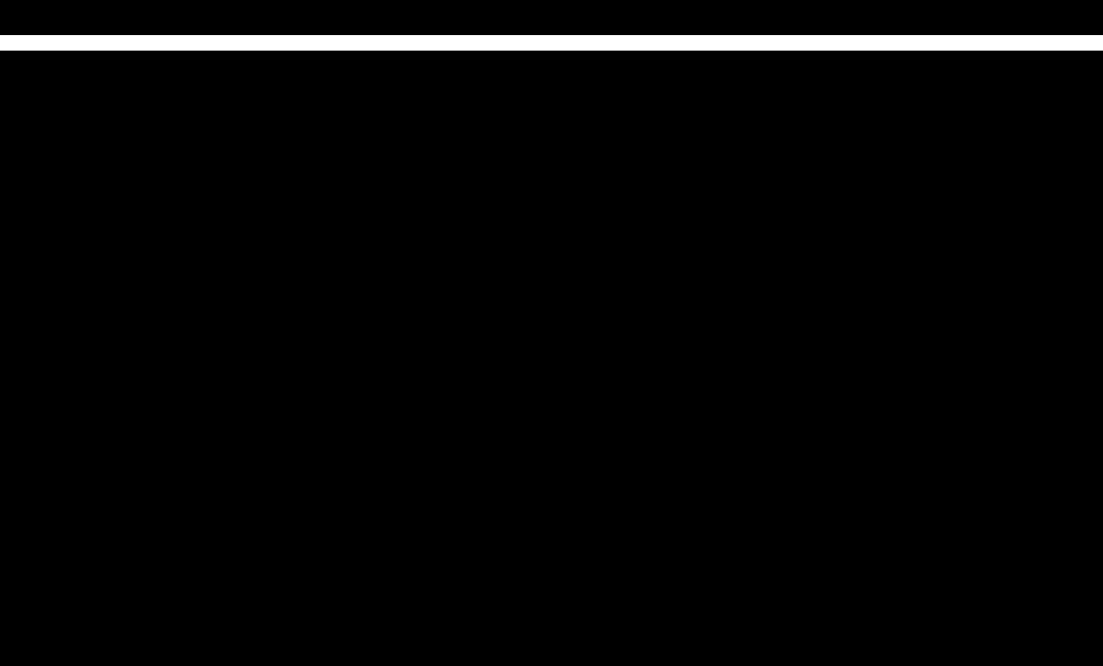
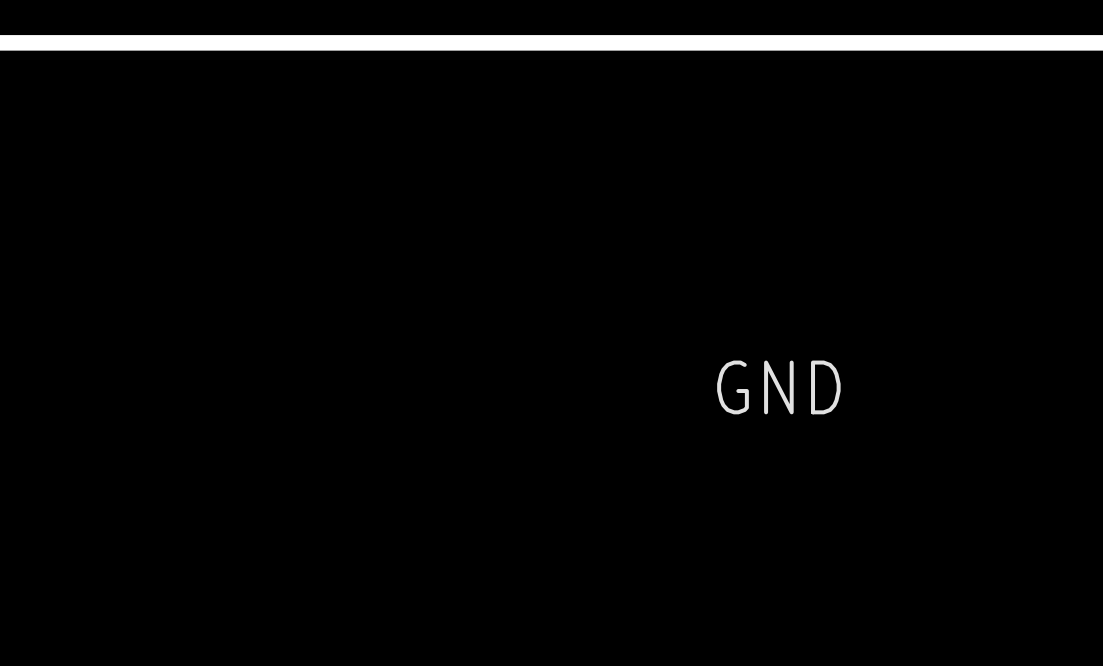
text: none -> GND (778, 387)

